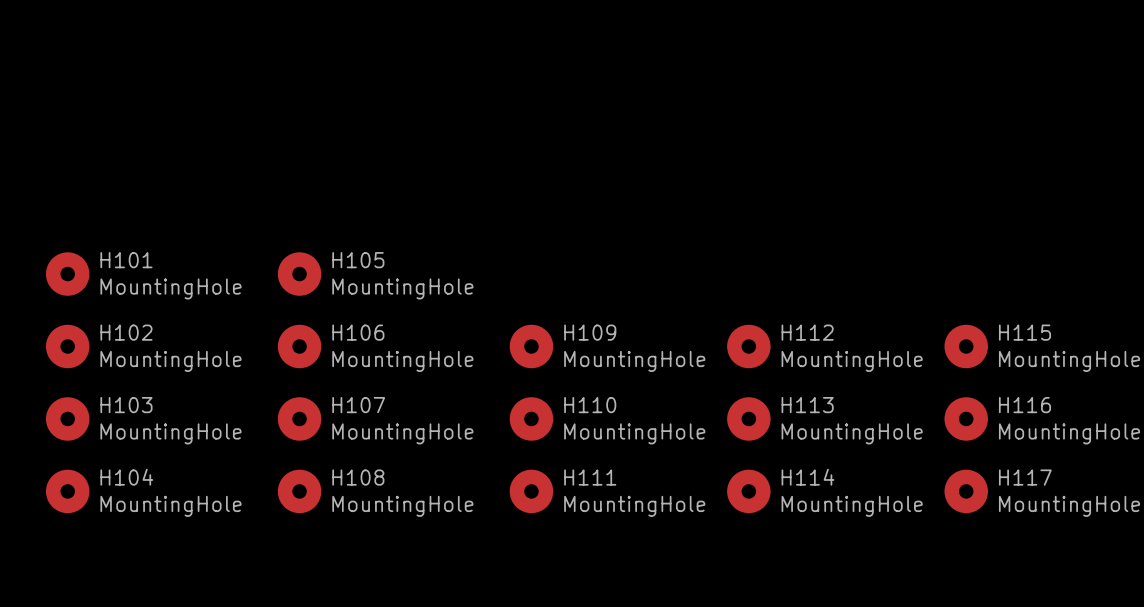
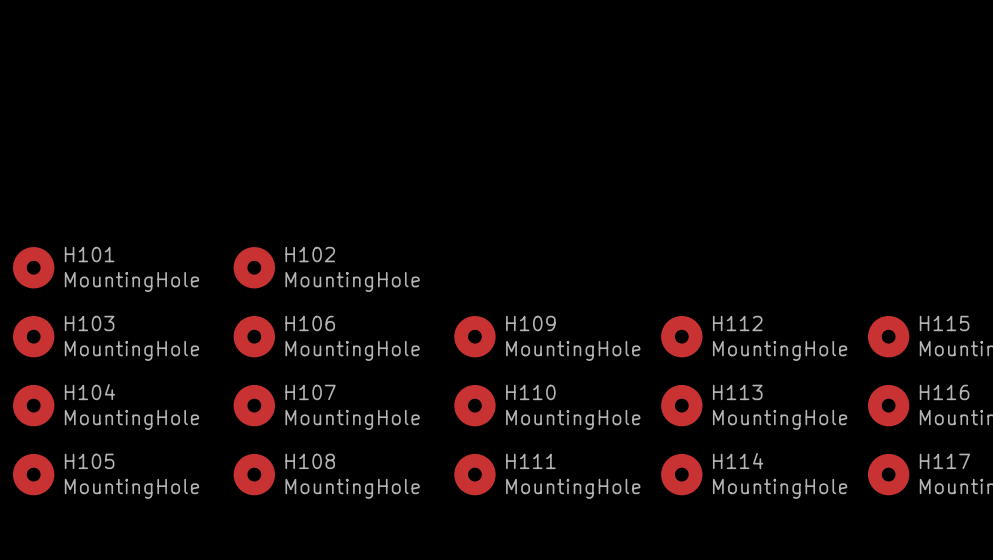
H105 name: H105 (358, 260) -> H102 (310, 254)
H102 name: H102 (126, 332) -> H103 (89, 323)
H103 name: H103 (126, 405) -> H104 (89, 392)
H104 name: H104 (126, 477) -> H105 (89, 461)

